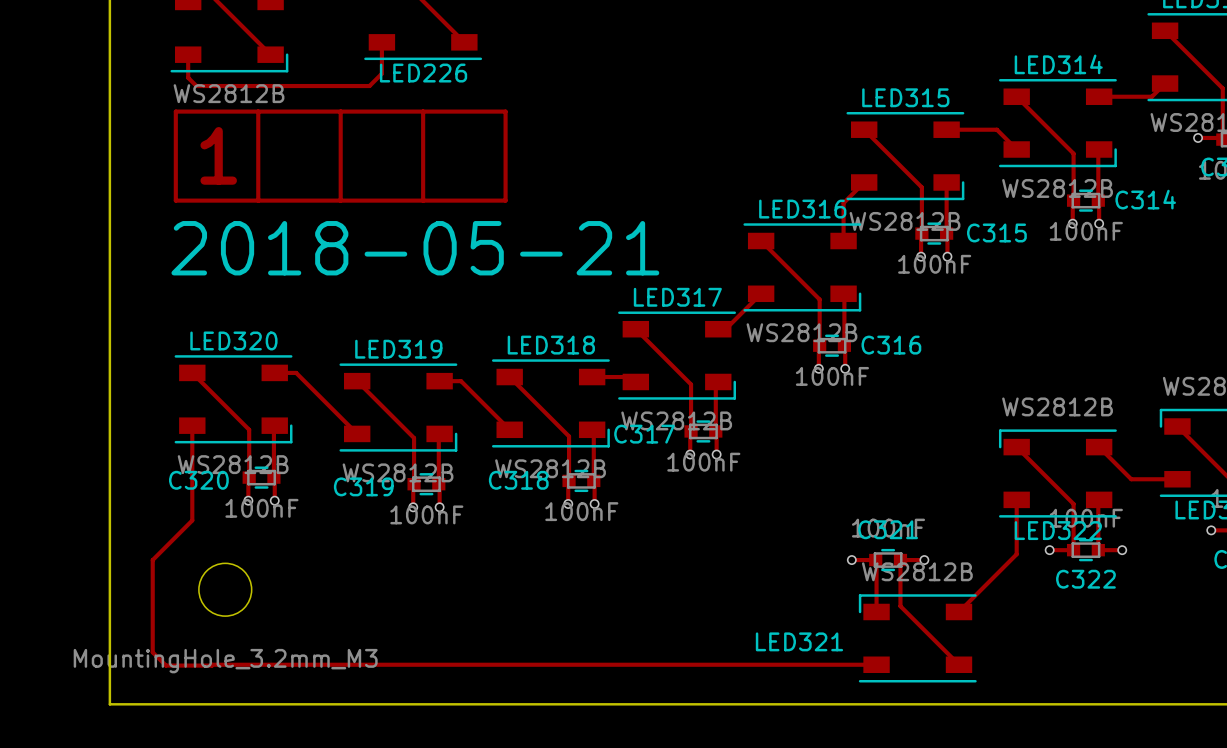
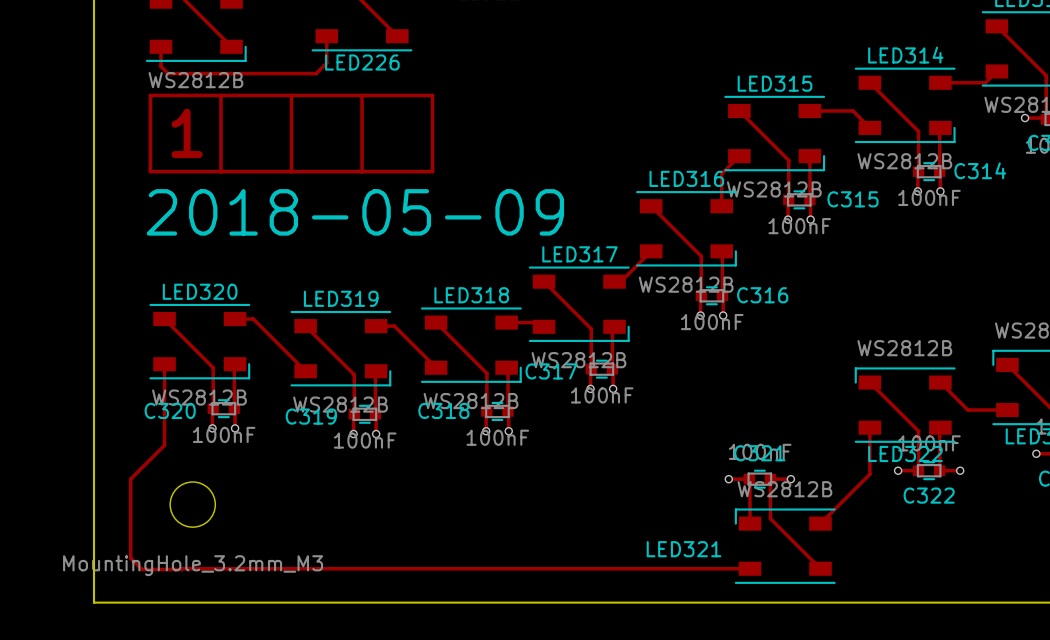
text: 2018-05-21 (415, 248) -> 2018-05-09 (355, 212)

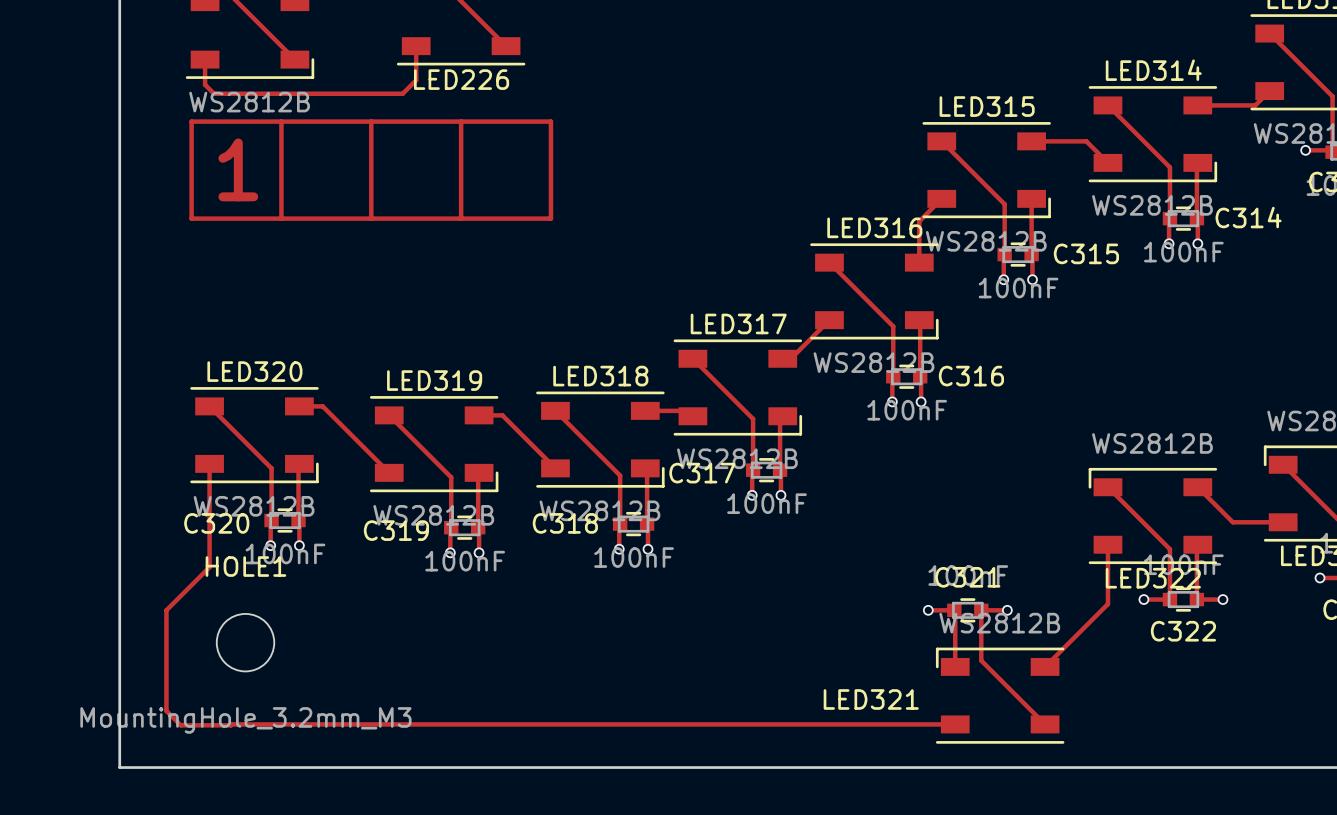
text: 2018-05-09 (355, 212) -> none
HOLE1 name: none -> HOLE1 (245, 566)

